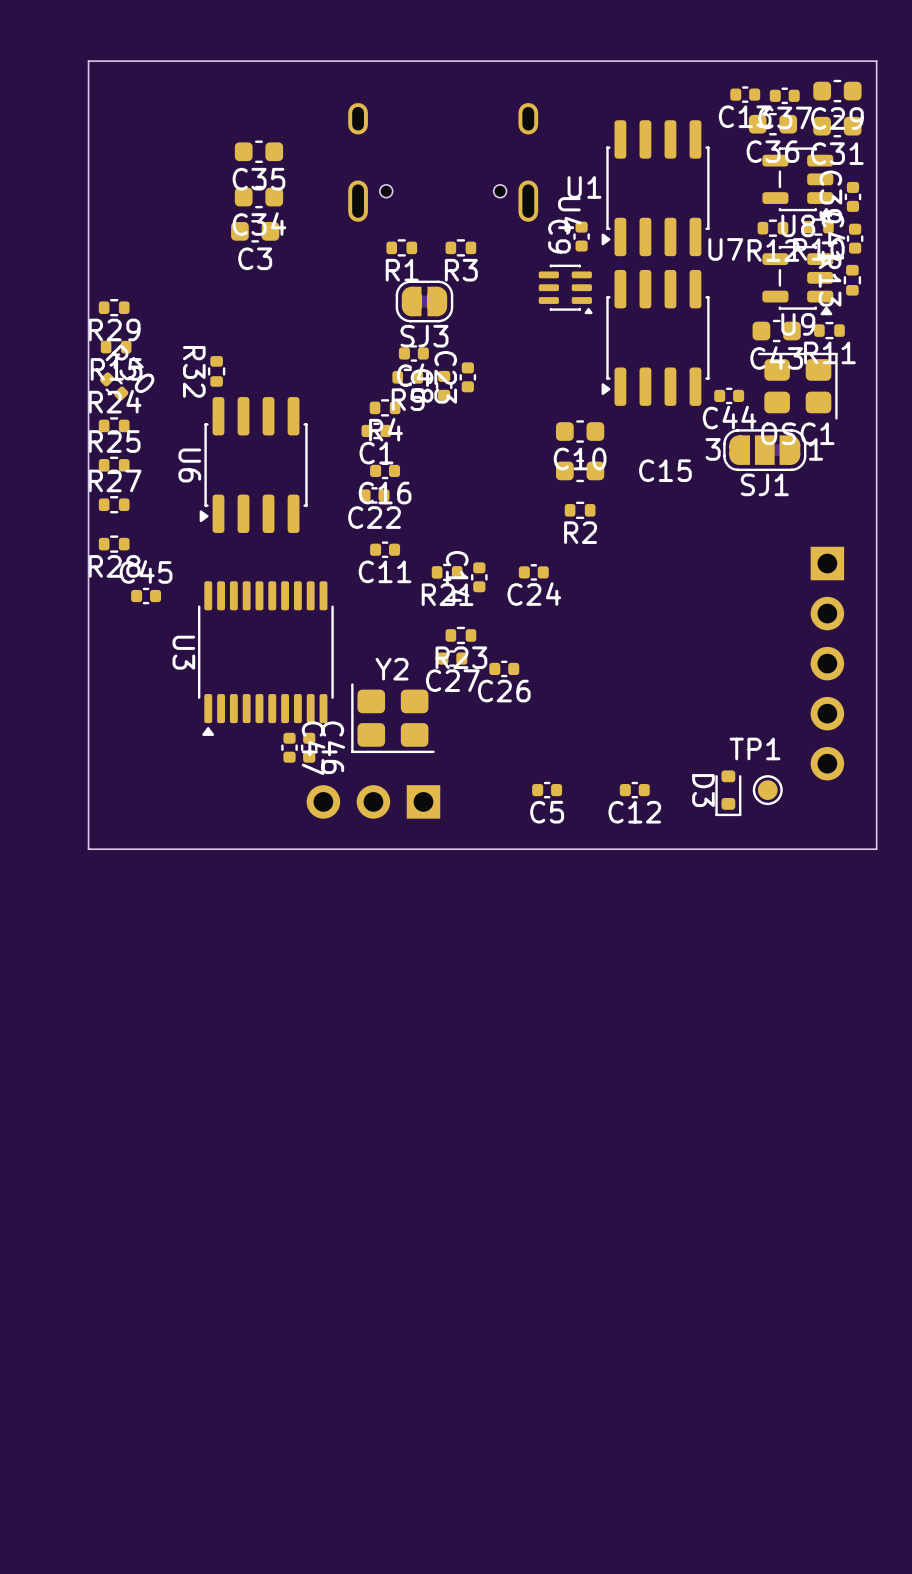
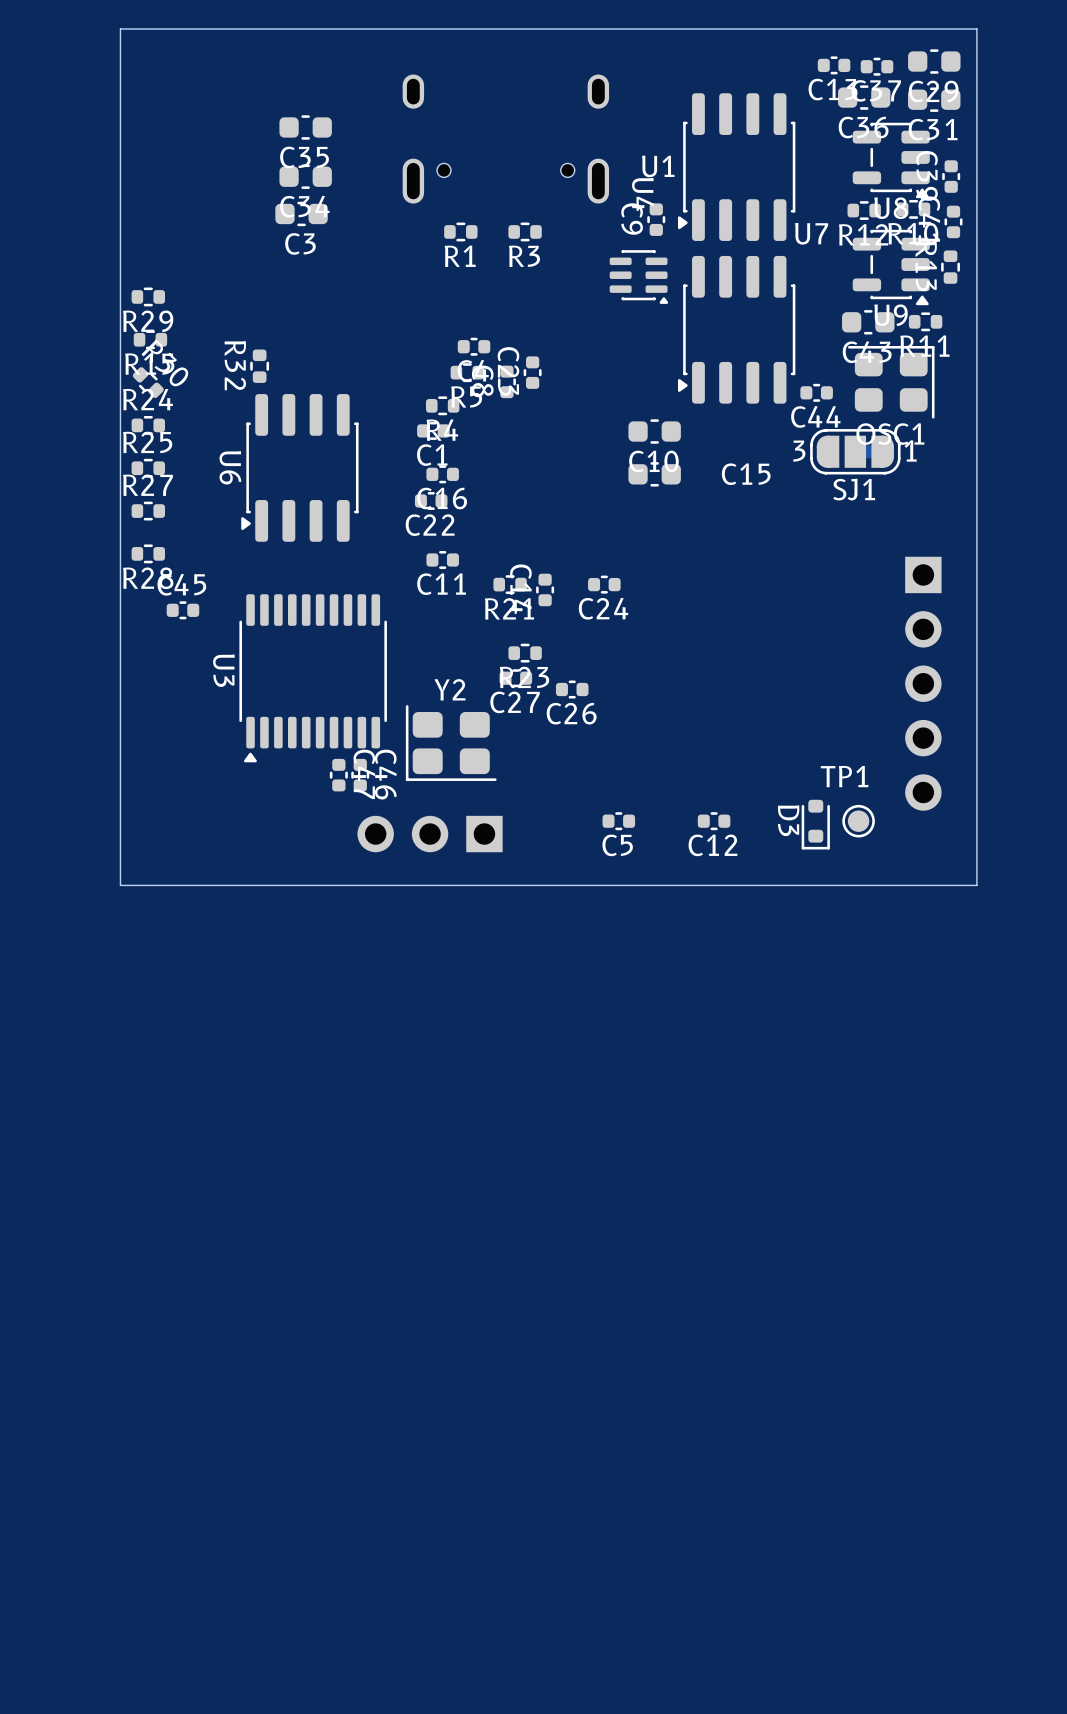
SJ3: (424, 301) -> none
R2: (580, 510) -> none

